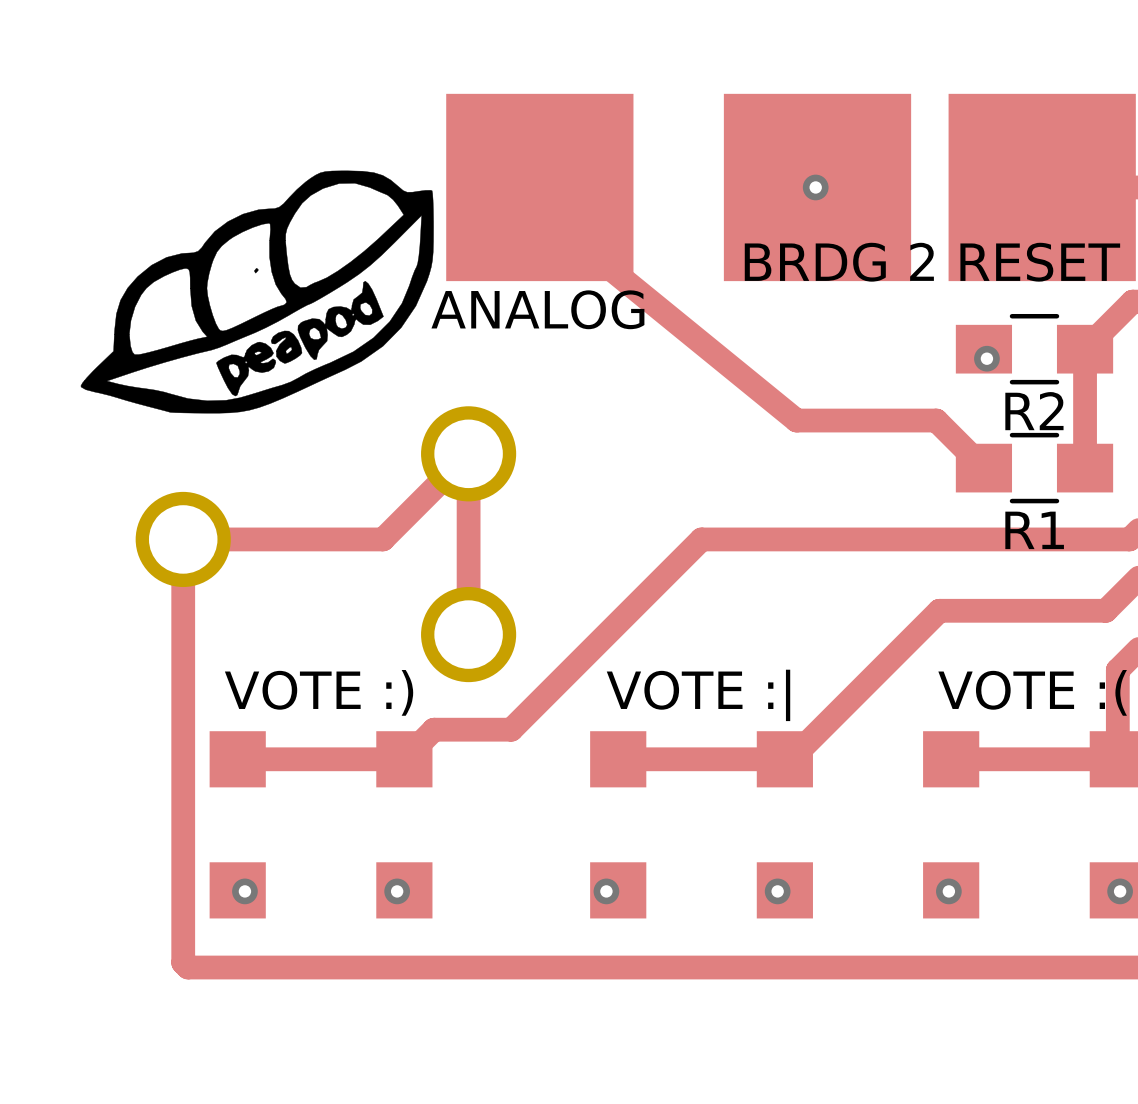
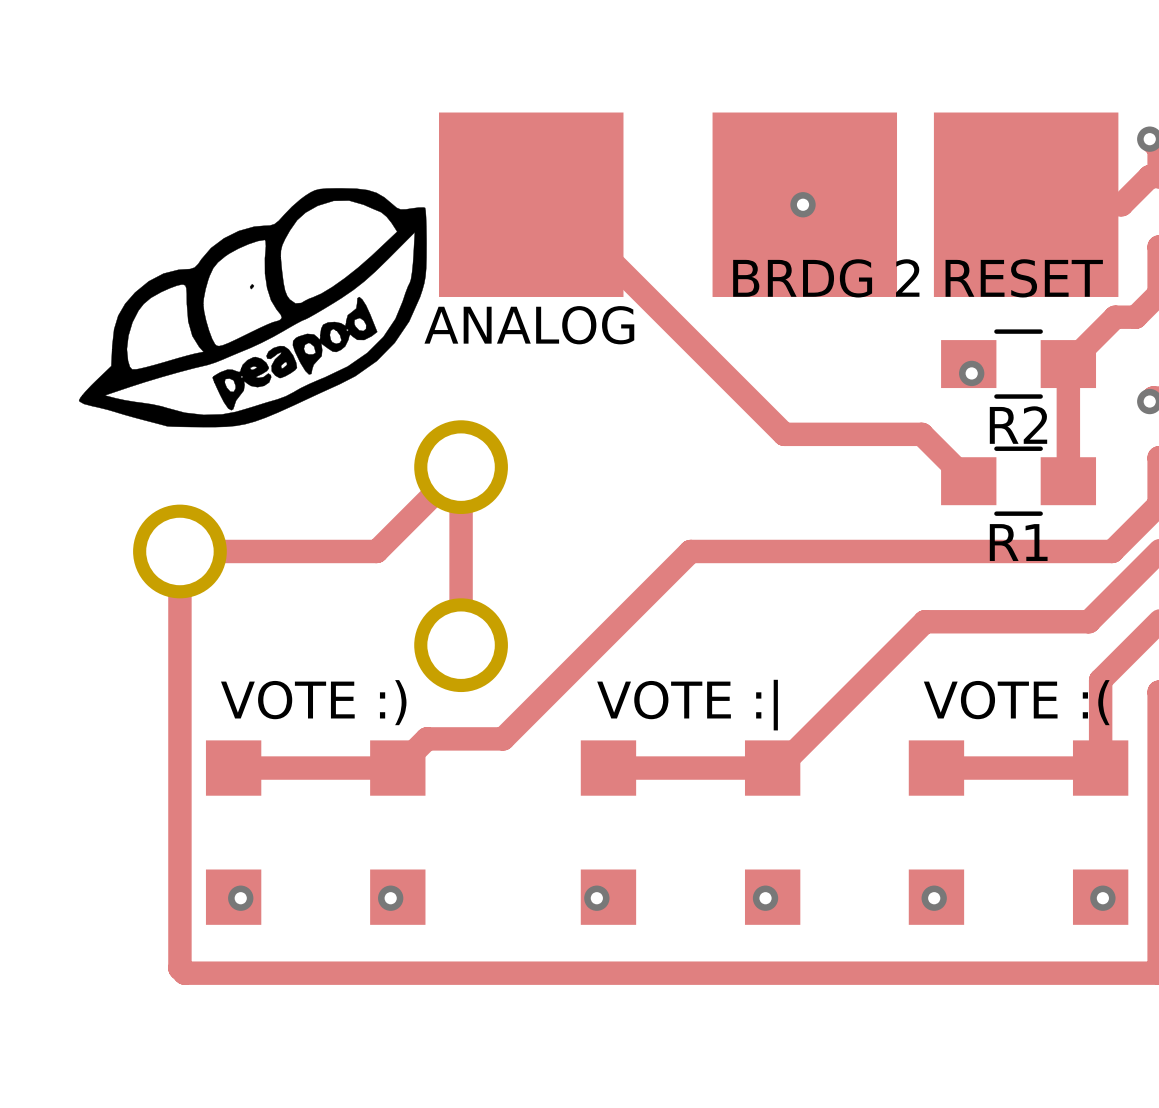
track: (539, 187) (539, 211) (796, 420) -> (578, 204) (578, 228) (784, 434)

